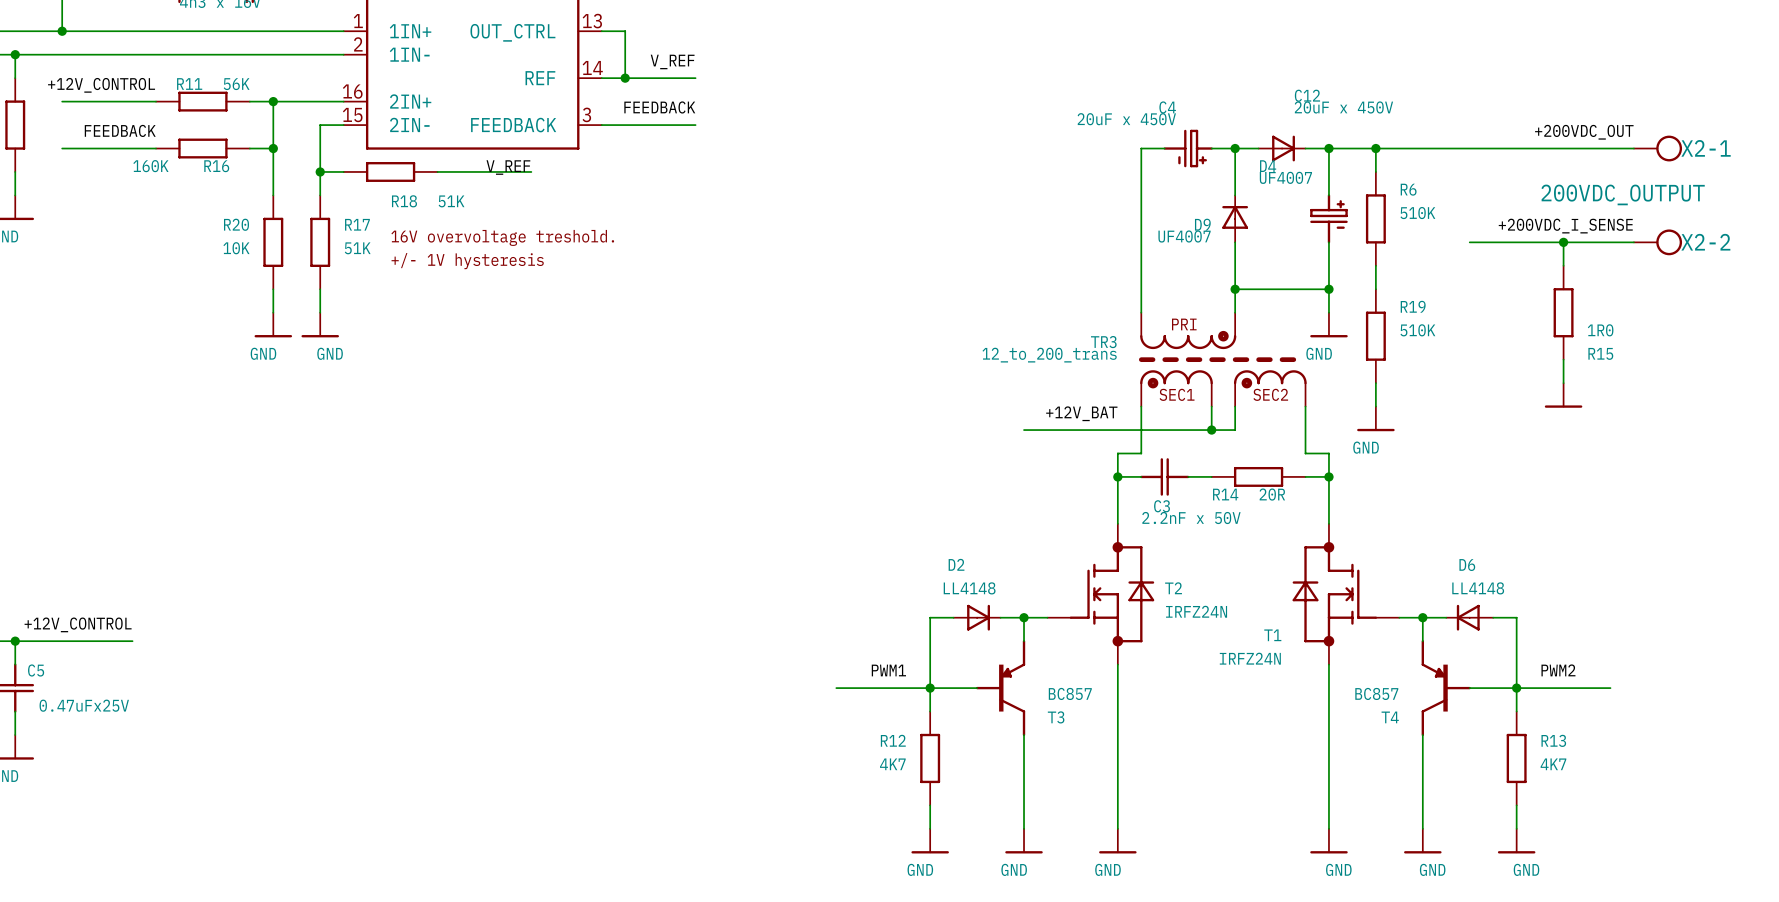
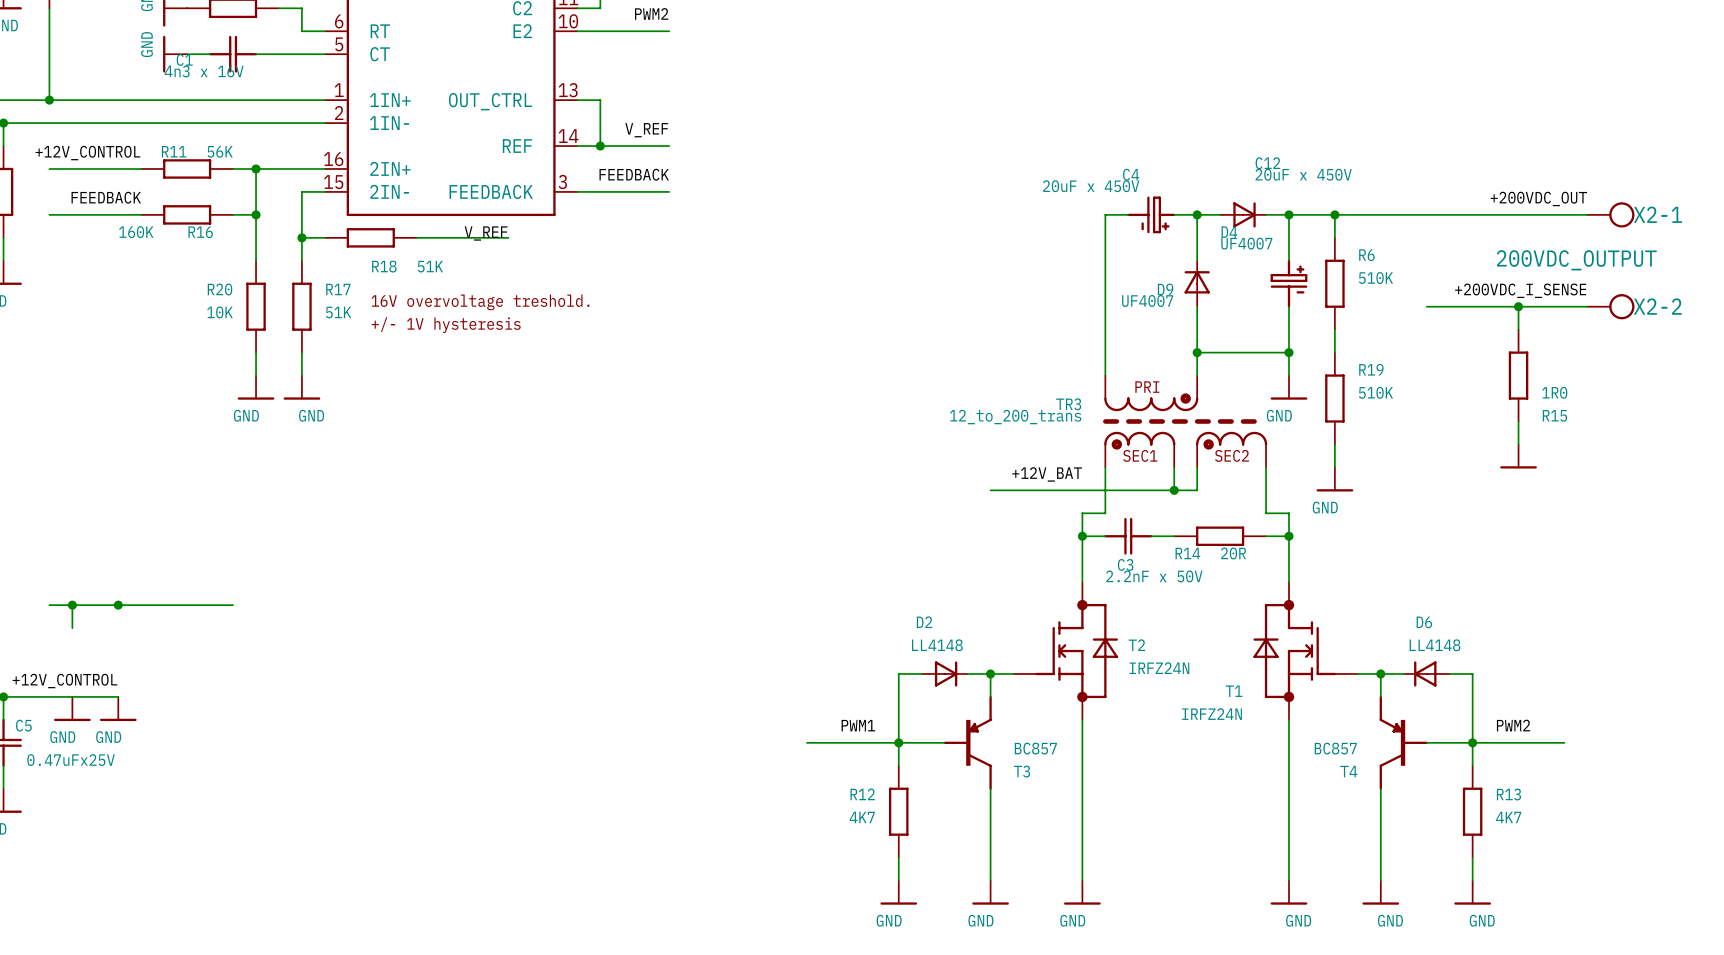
wire: none -> (49, 605) (233, 605)
wire: none -> (72, 605) (72, 628)
junction: none -> (72, 605)
junction: none -> (118, 605)
power symbol: none -> GND (72, 708)
power symbol: none -> GND (118, 708)

